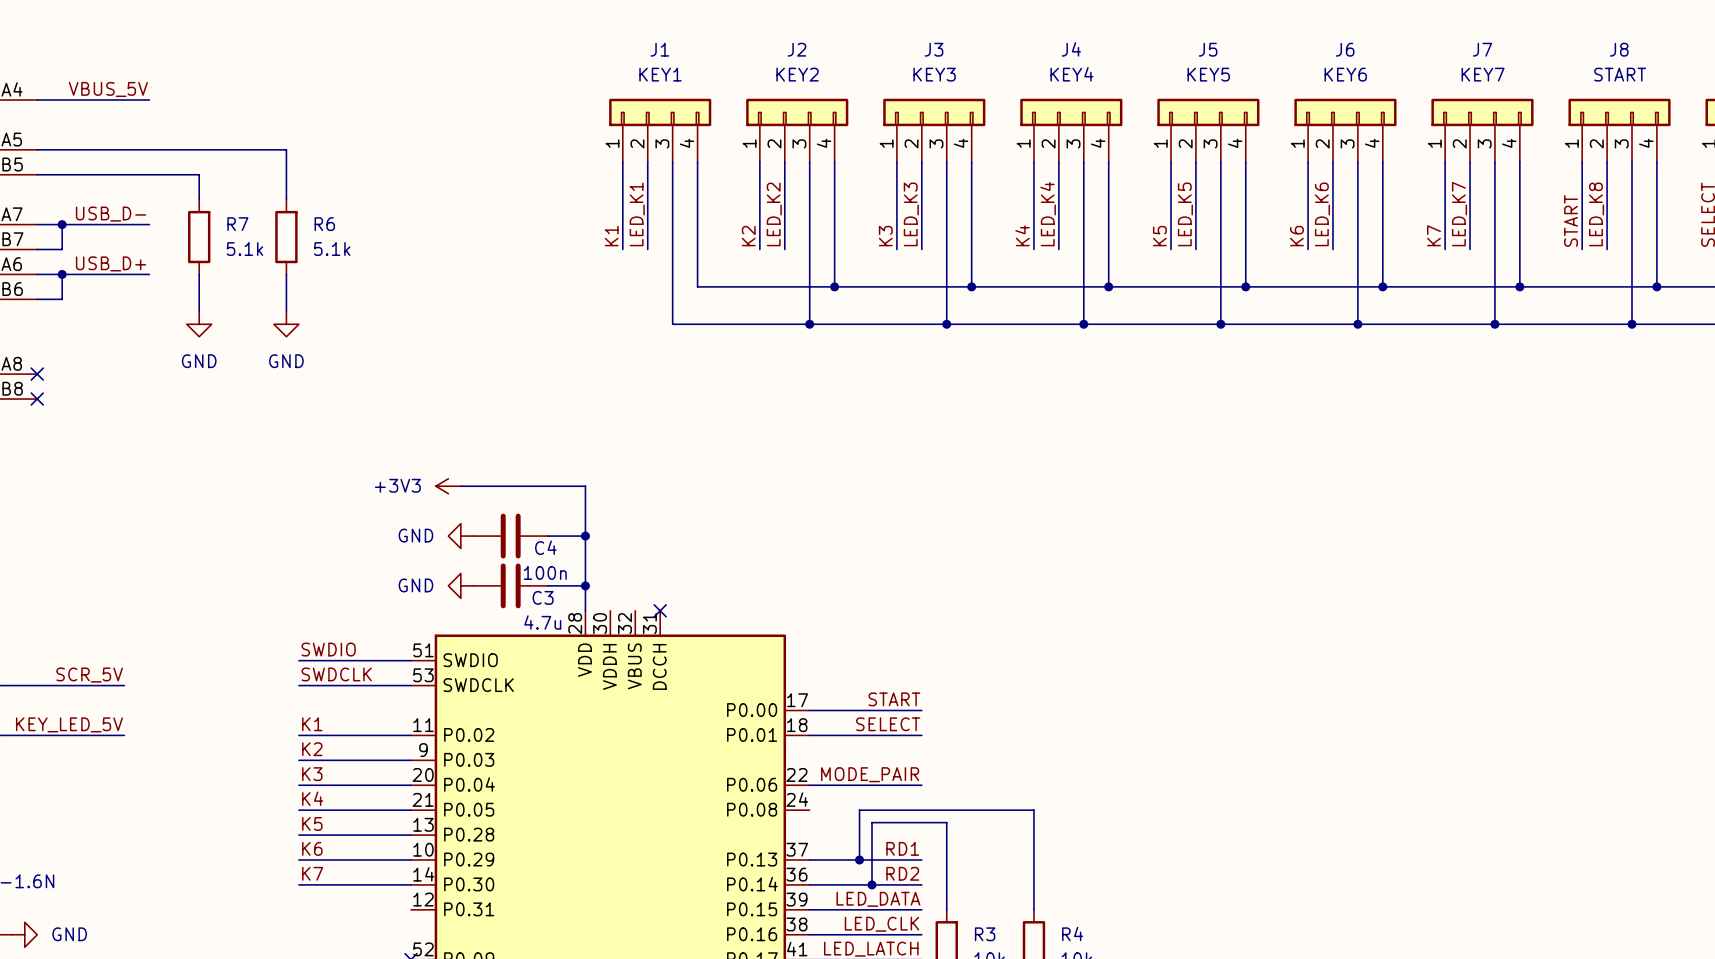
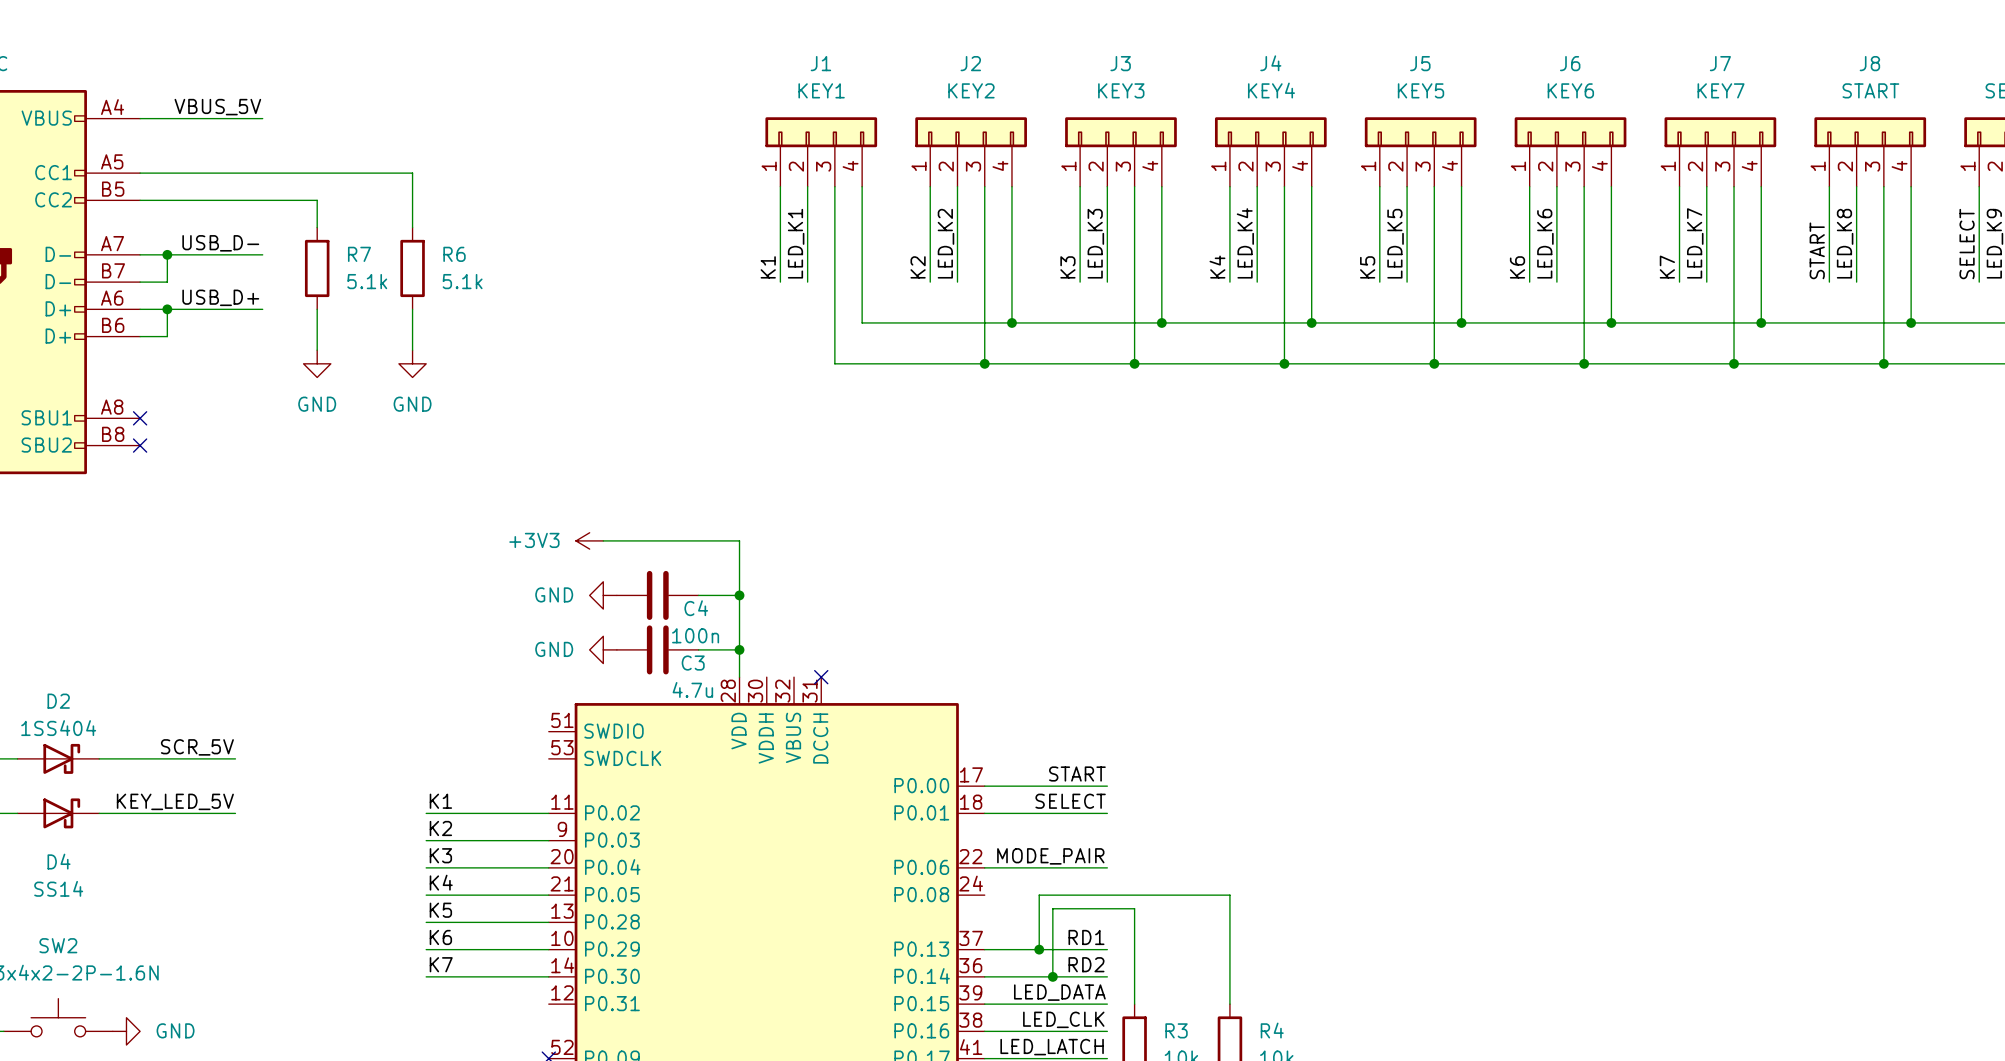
label: SWDIO (328, 649) -> none
wire: (298, 660) (411, 660) -> none
label: SWDCLK (336, 674) -> none
wire: (298, 685) (411, 685) -> none

